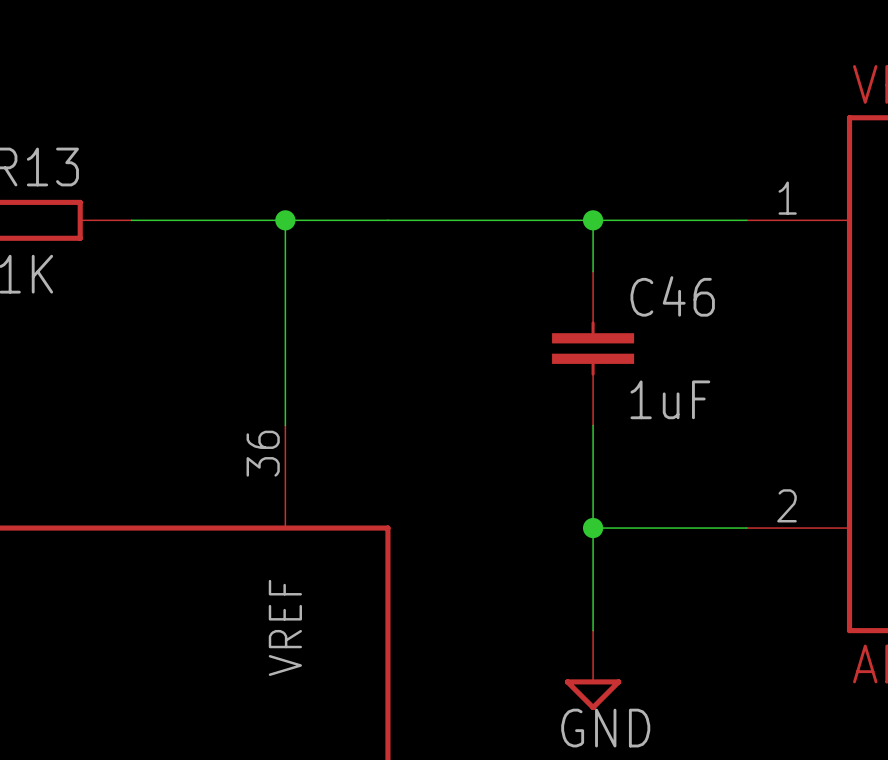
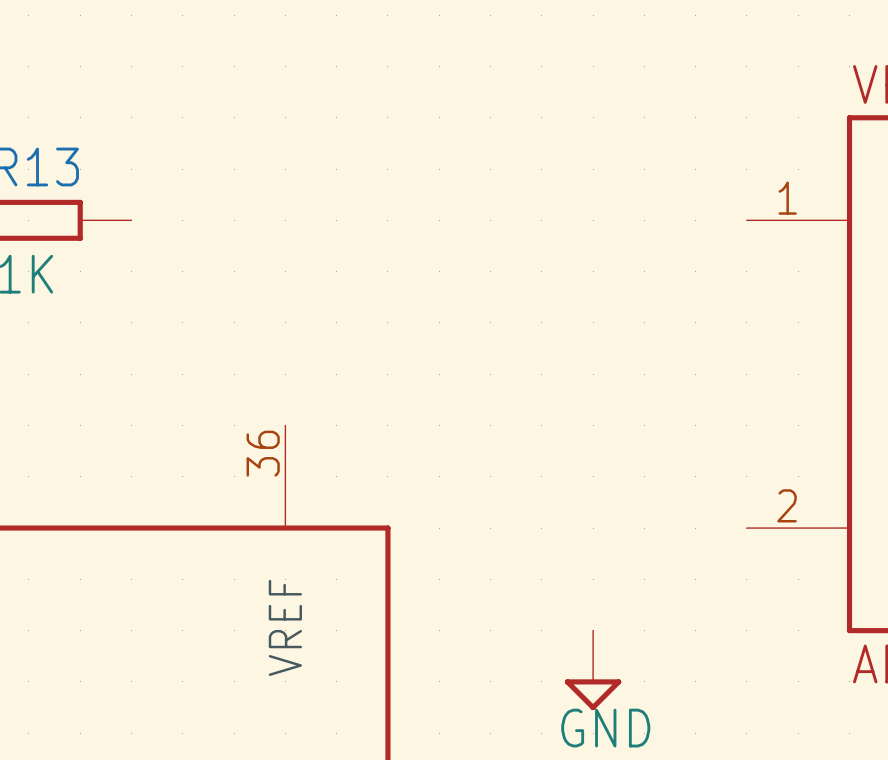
wire: (131, 220) (746, 220) -> none
wire: (285, 220) (285, 425) -> none
junction: (285, 220) -> none
wire: (593, 220) (593, 271) -> none
junction: (593, 220) -> none
C46: 1uF (593, 348) -> none
wire: (593, 425) (593, 630) -> none
wire: (593, 528) (746, 528) -> none
junction: (593, 528) -> none

